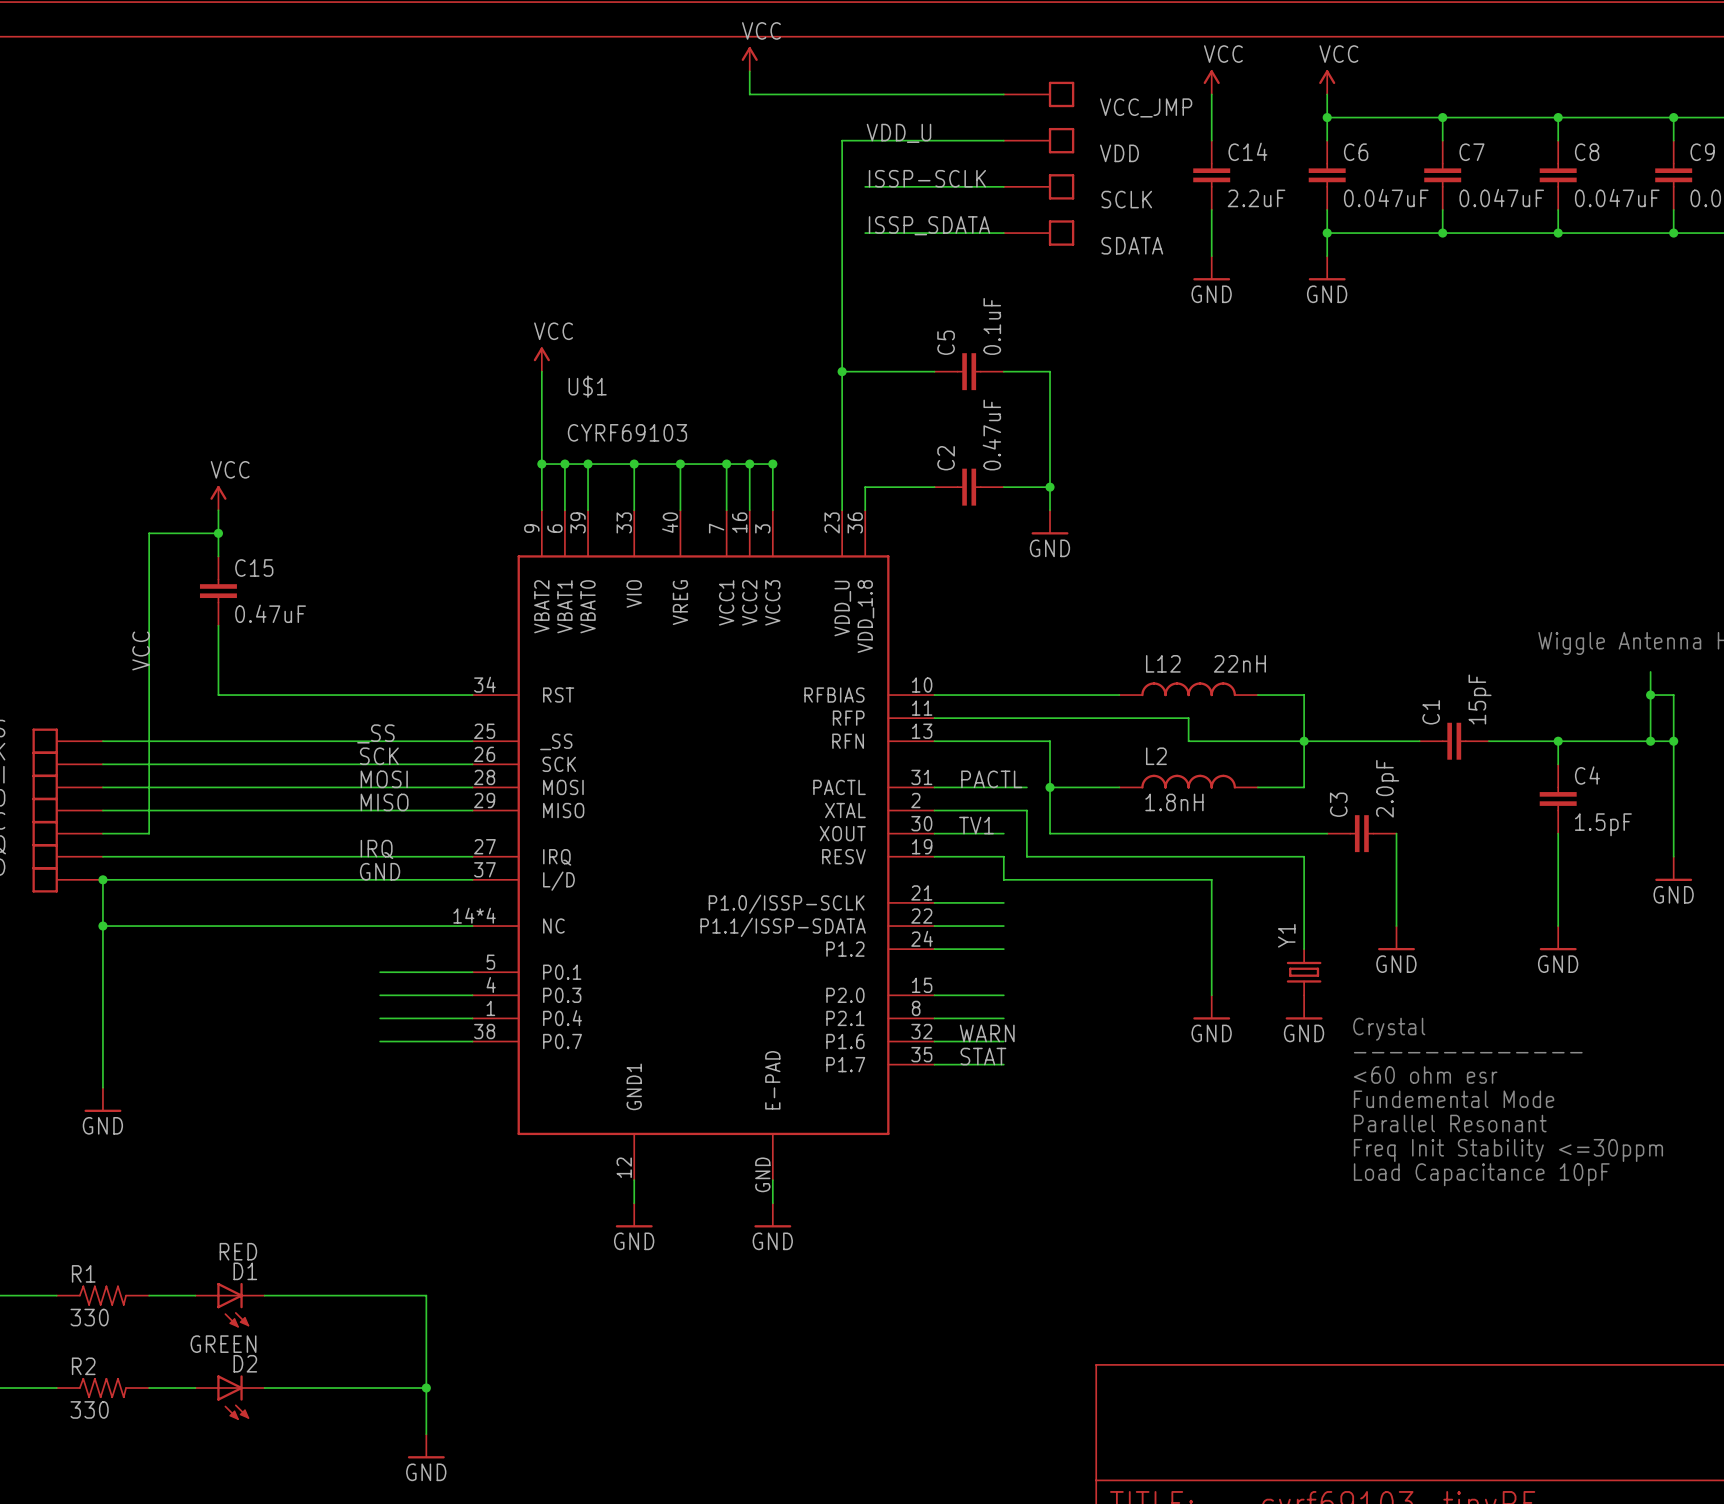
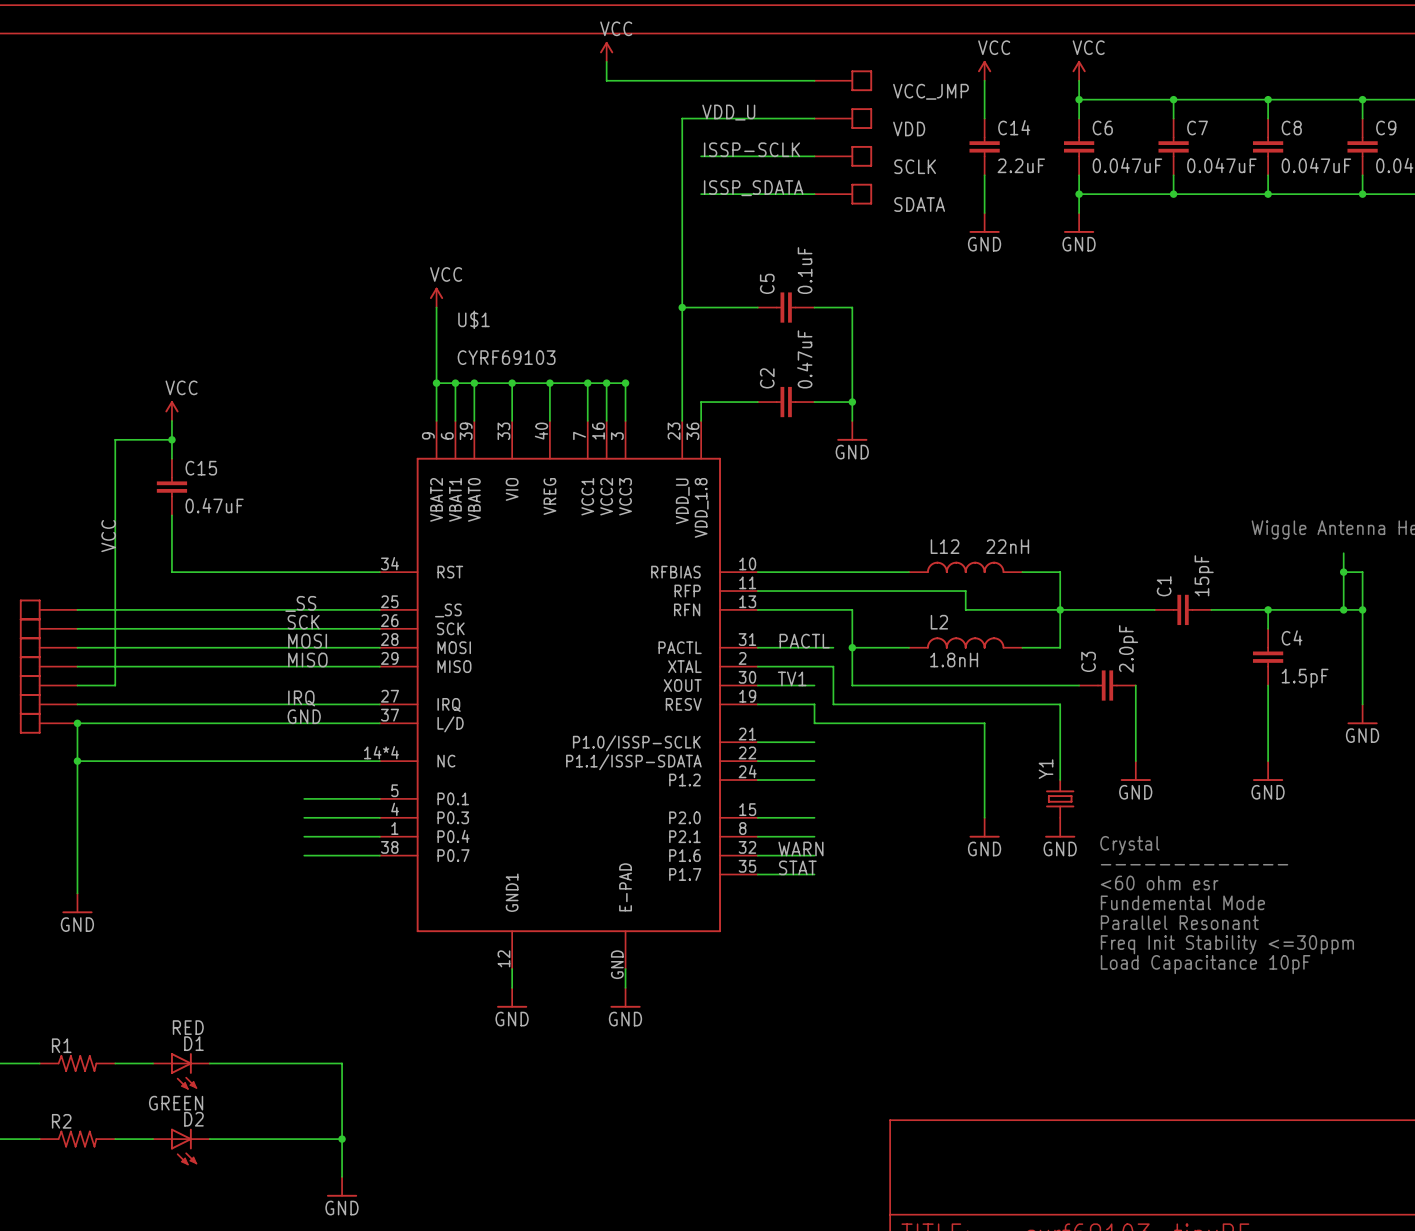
R1 value: 330 (89, 1317) -> none
R2 value: 330 (89, 1409) -> none

